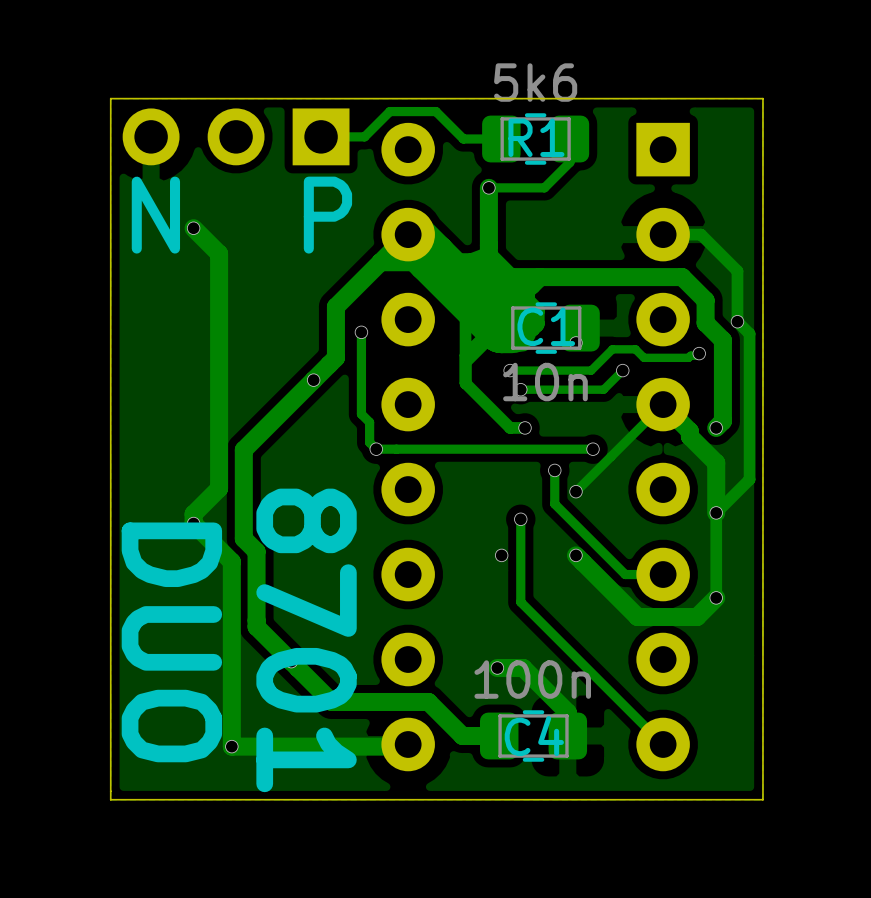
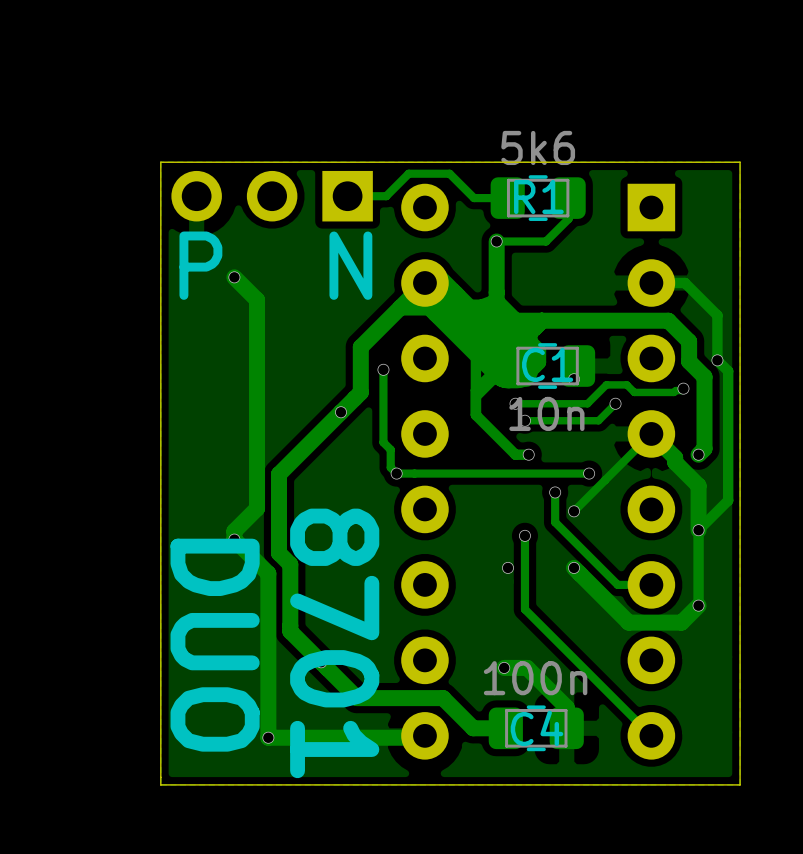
text: N P (241, 215) -> P N (275, 265)

